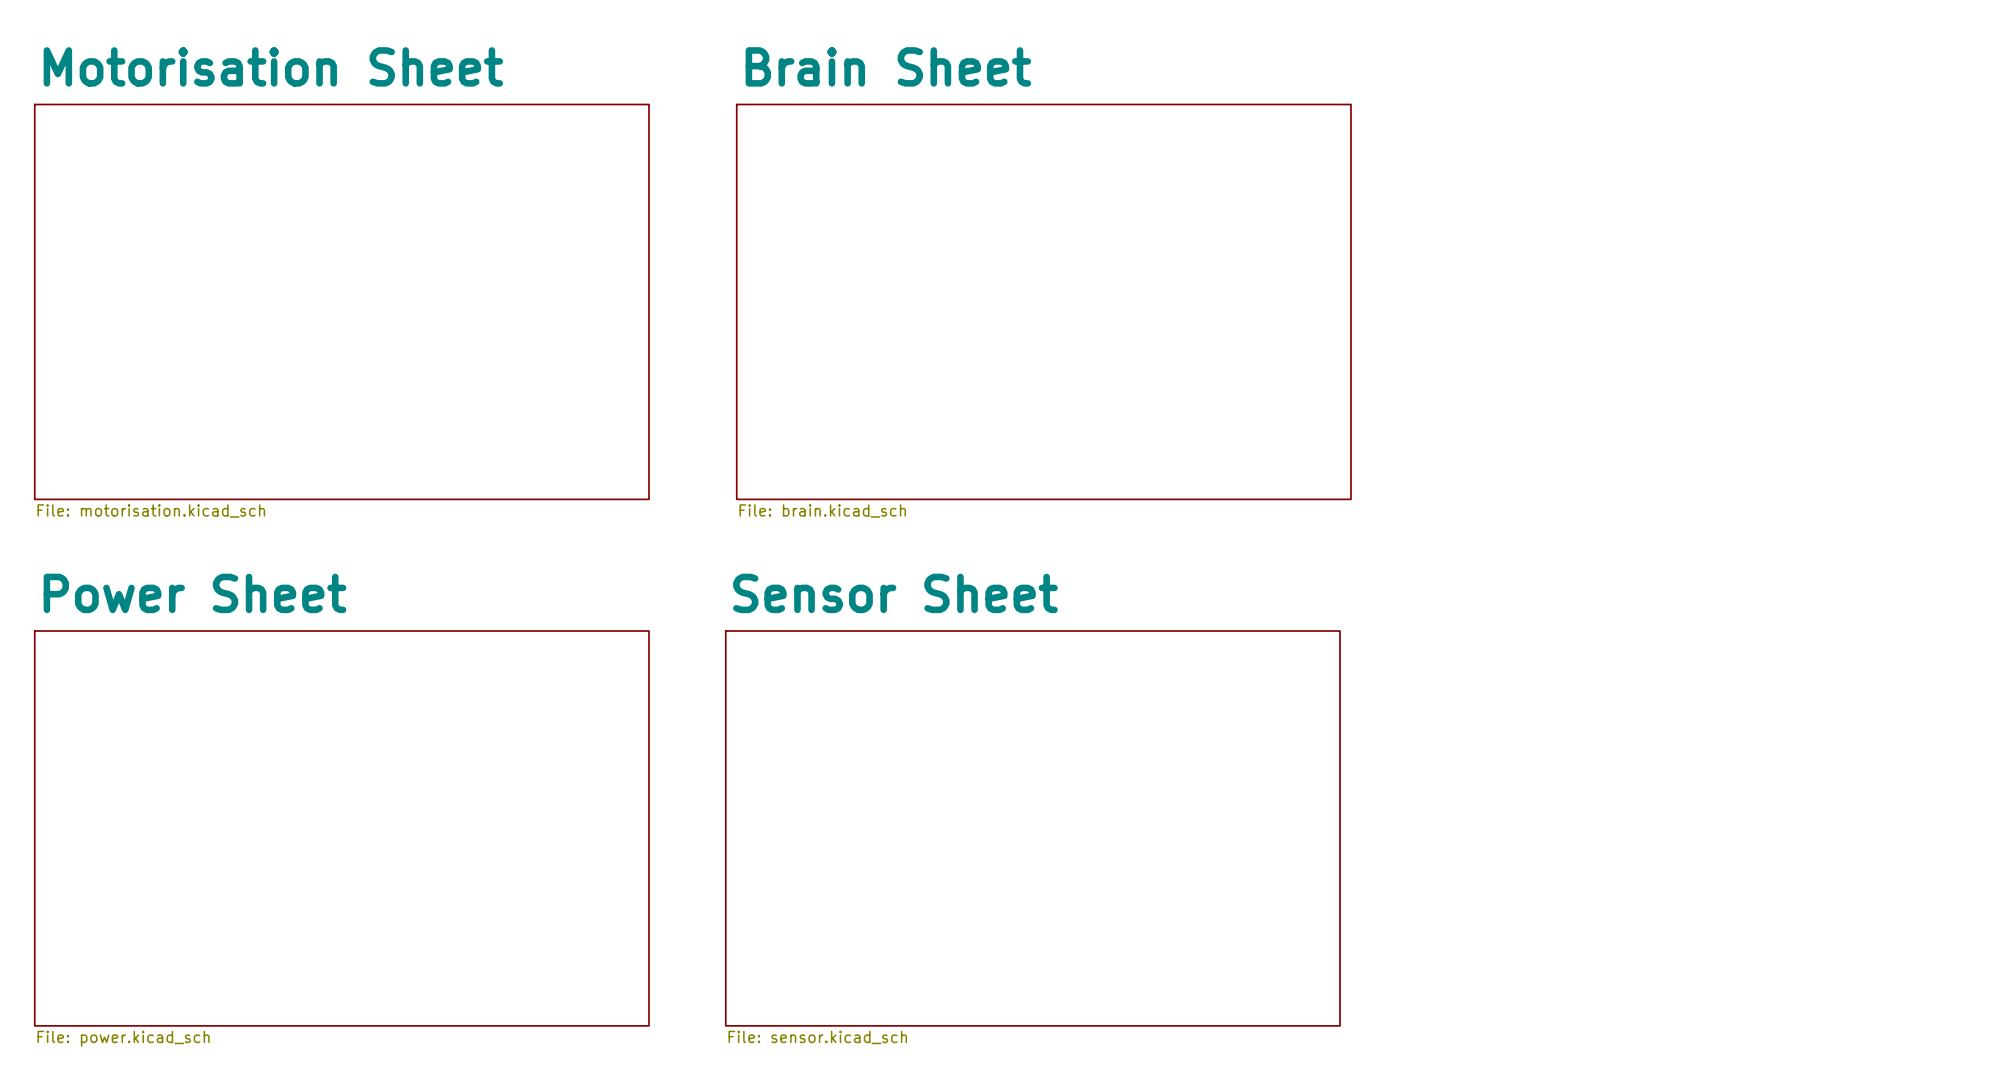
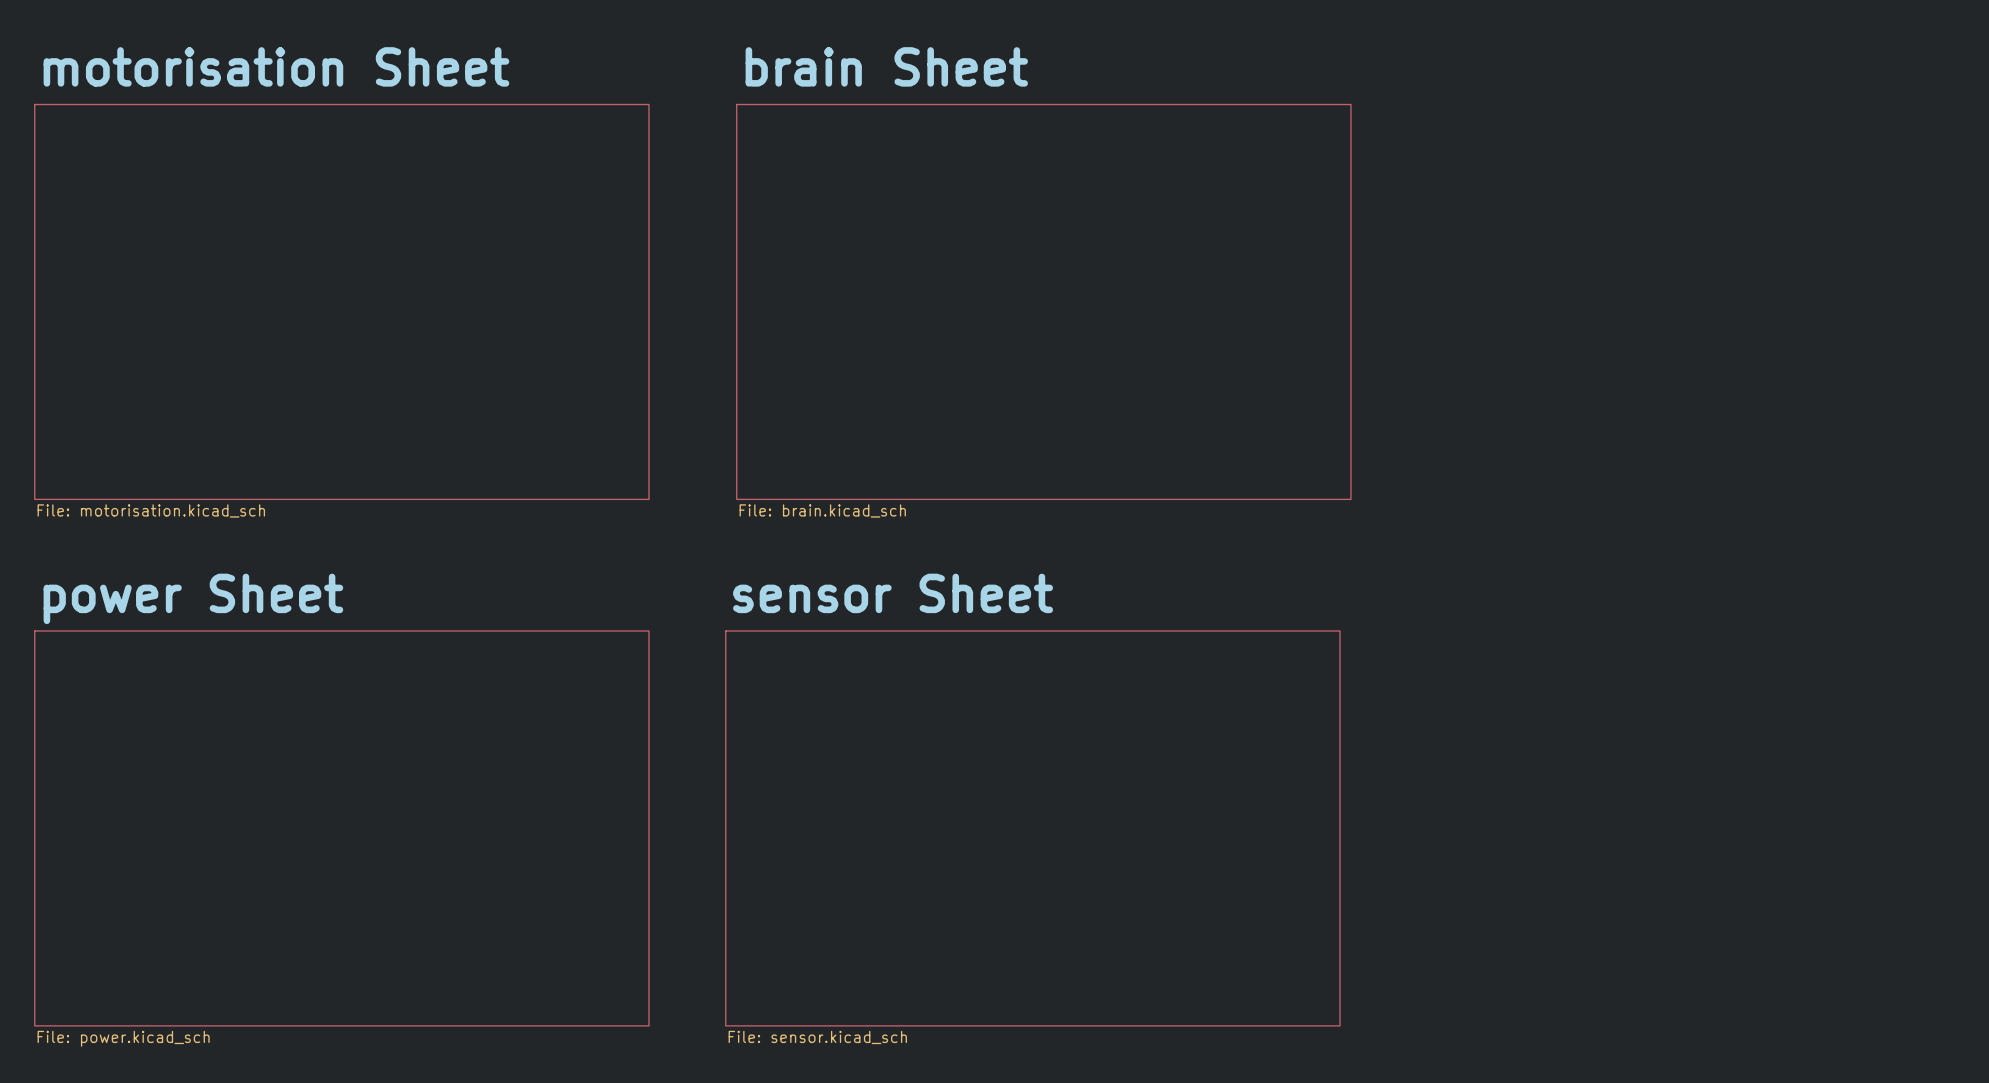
sheet Motorisation Sheet name: Motorisation Sheet (273, 66) -> motorisation Sheet (276, 66)
sheet Brain Sheet name: Brain Sheet (888, 66) -> brain Sheet (886, 66)
sheet Power Sheet name: Power Sheet (194, 593) -> power Sheet (193, 598)
sheet Sensor Sheet name: Sensor Sheet (895, 593) -> sensor Sheet (893, 593)

